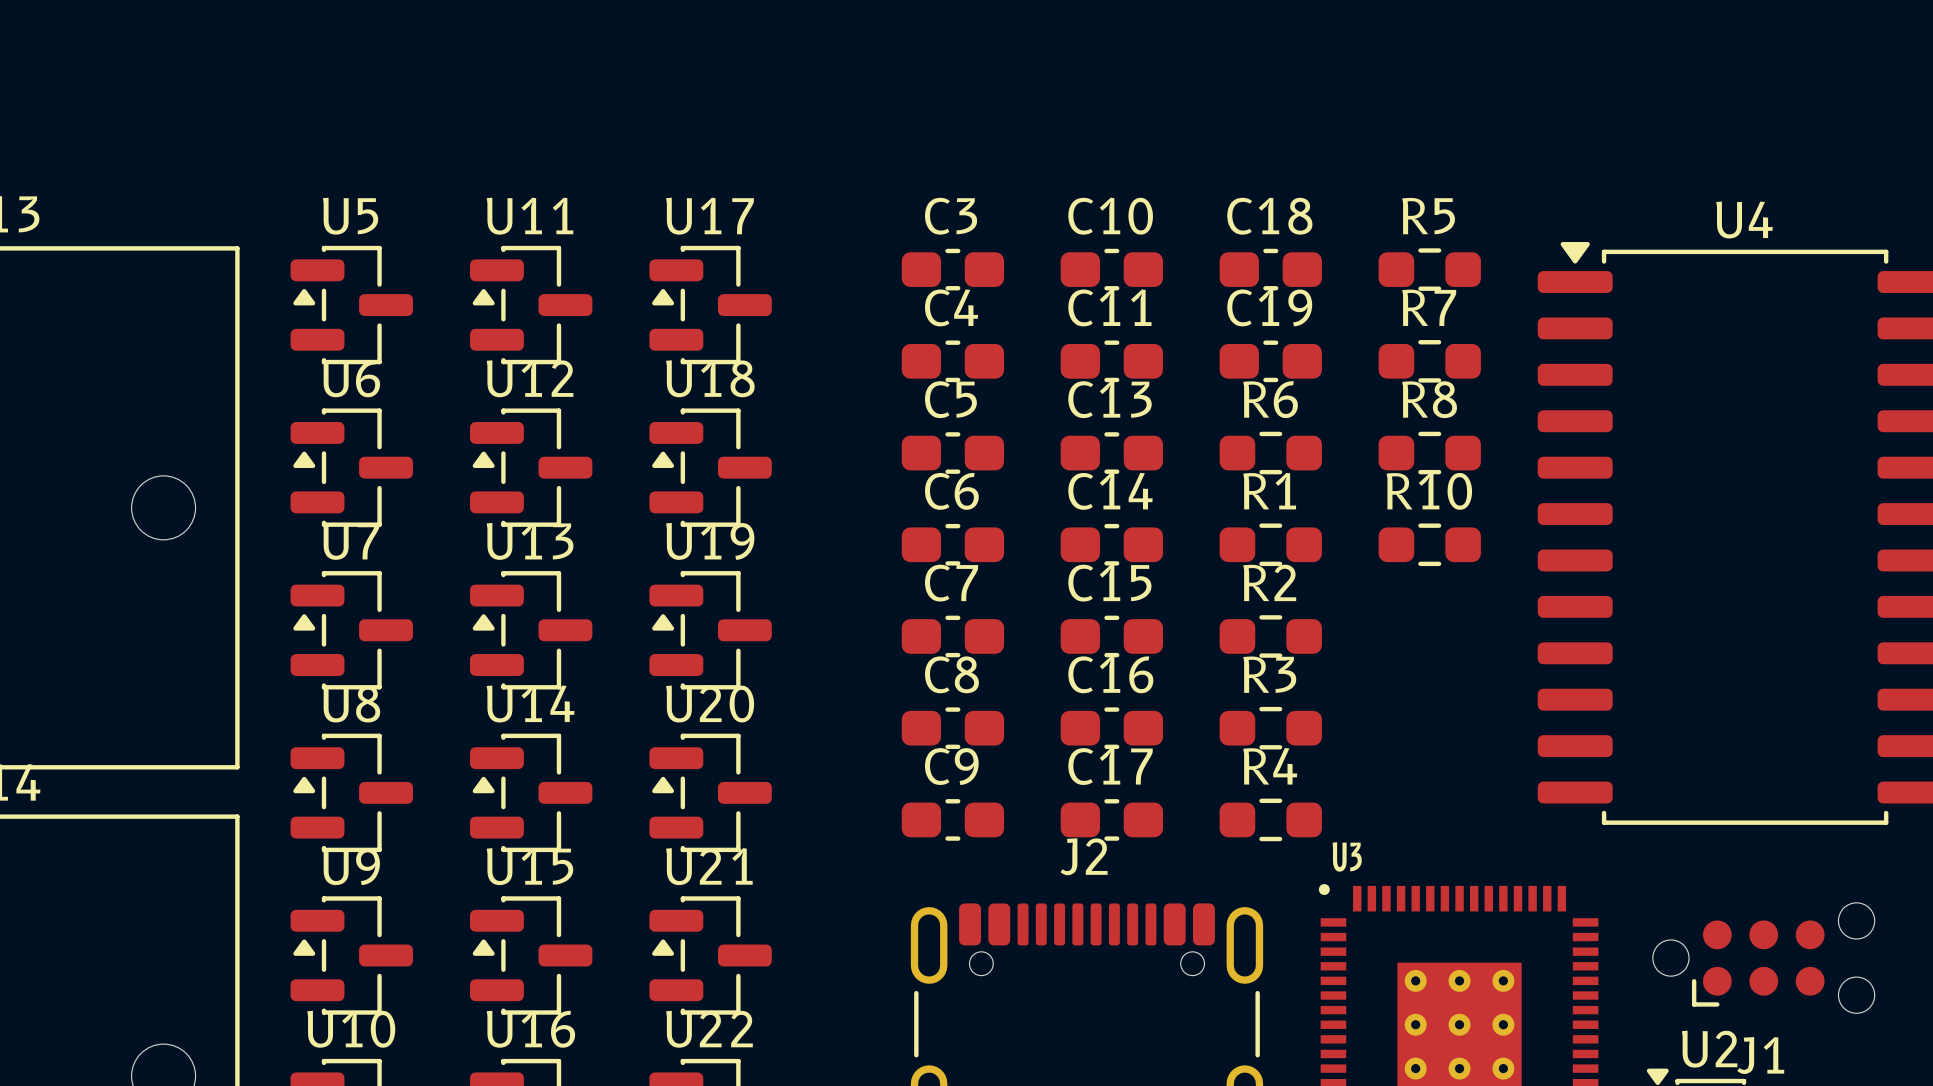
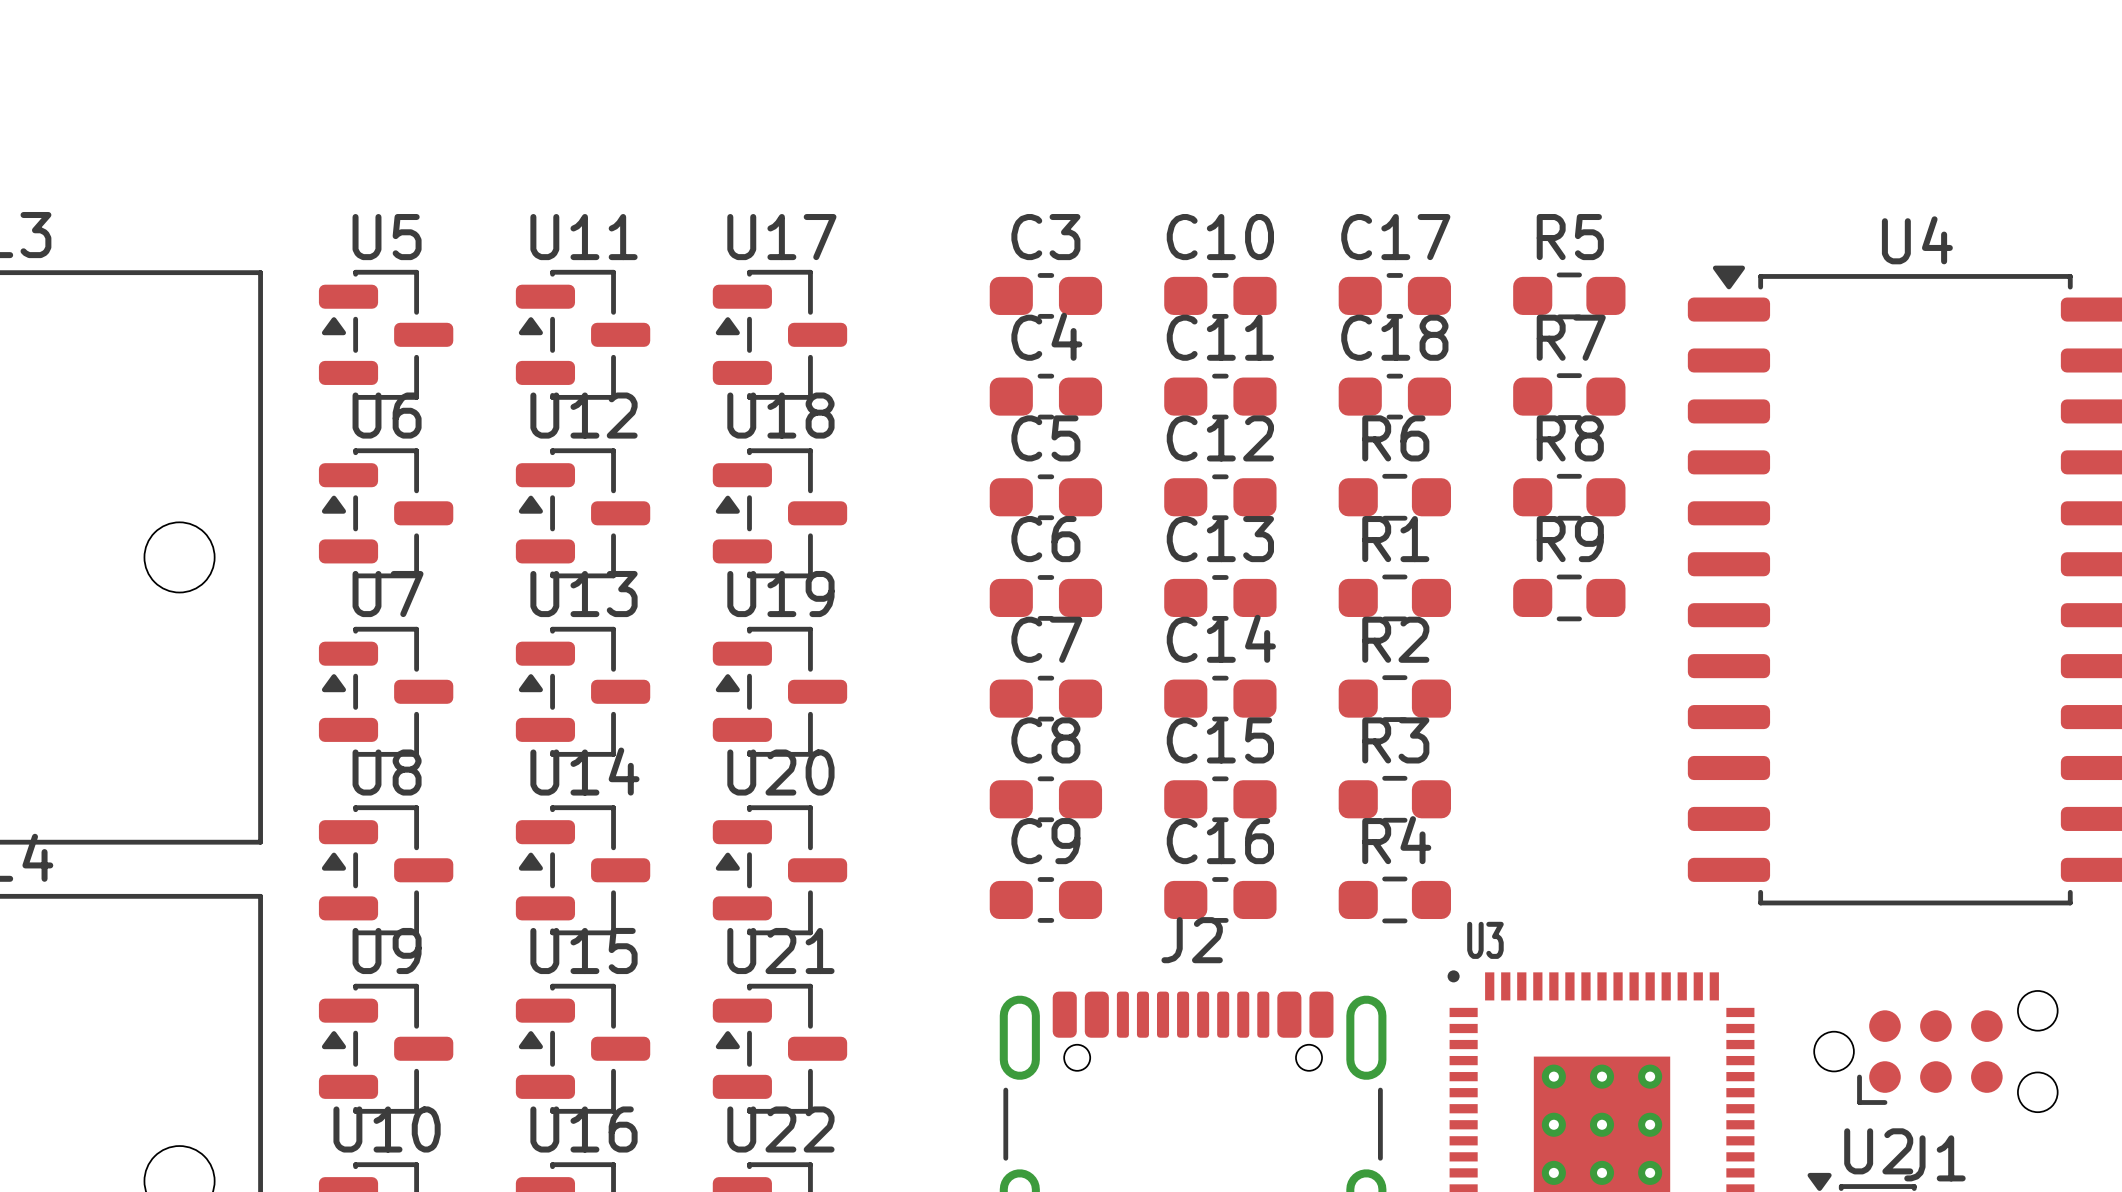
C18 name: C18 (1269, 216) -> C17 (1395, 237)
C19 name: C19 (1269, 307) -> C18 (1394, 337)
C13 name: C13 (1110, 399) -> C12 (1220, 438)
C14 name: C14 (1110, 491) -> C13 (1220, 539)
R10 name: R10 (1429, 491) -> R9 (1570, 539)
C15 name: C15 (1109, 583) -> C14 (1221, 638)
C16 name: C16 (1110, 674) -> C15 (1220, 740)
C17 name: C17 (1110, 766) -> C16 (1220, 841)

